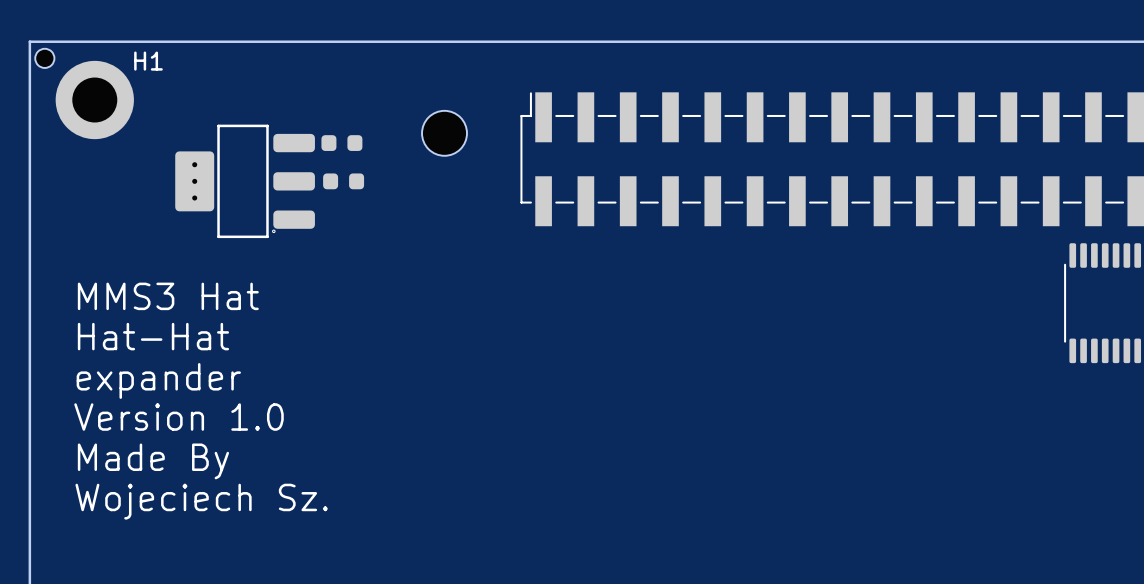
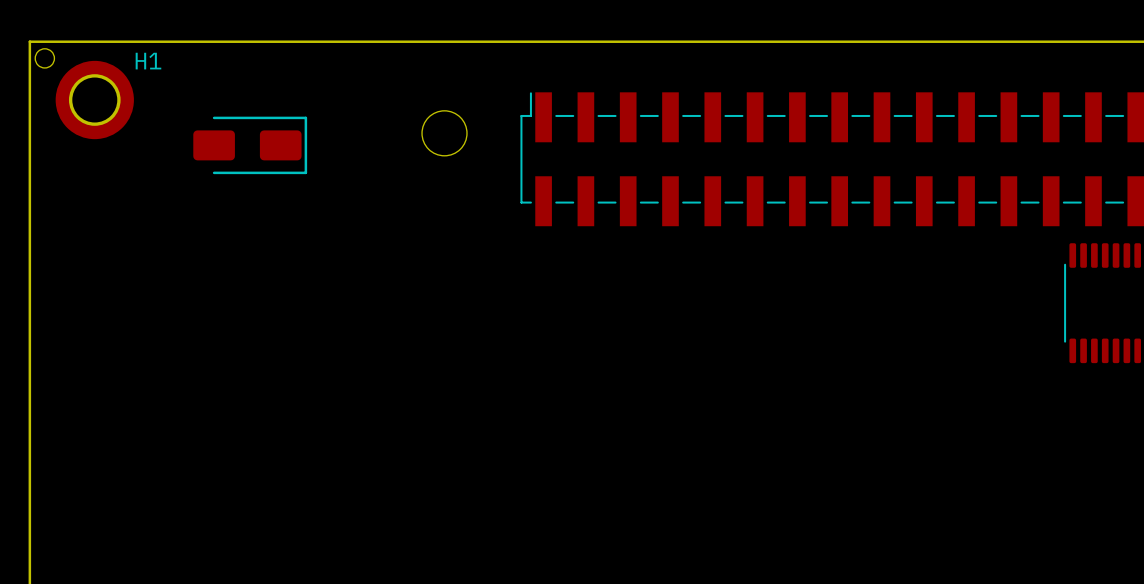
part: (341, 143) -> none
part: none -> (250, 145)
part: (245, 181) -> none
part: (343, 181) -> none
text: MMS3 Hat (168, 296) -> none
text: Hat-Hat (153, 336) -> none
text: expander (158, 380) -> none
text: Version 1.0 (179, 417) -> none
text: Made By (153, 461) -> none
text: Wojeciech Sz. (201, 501) -> none

